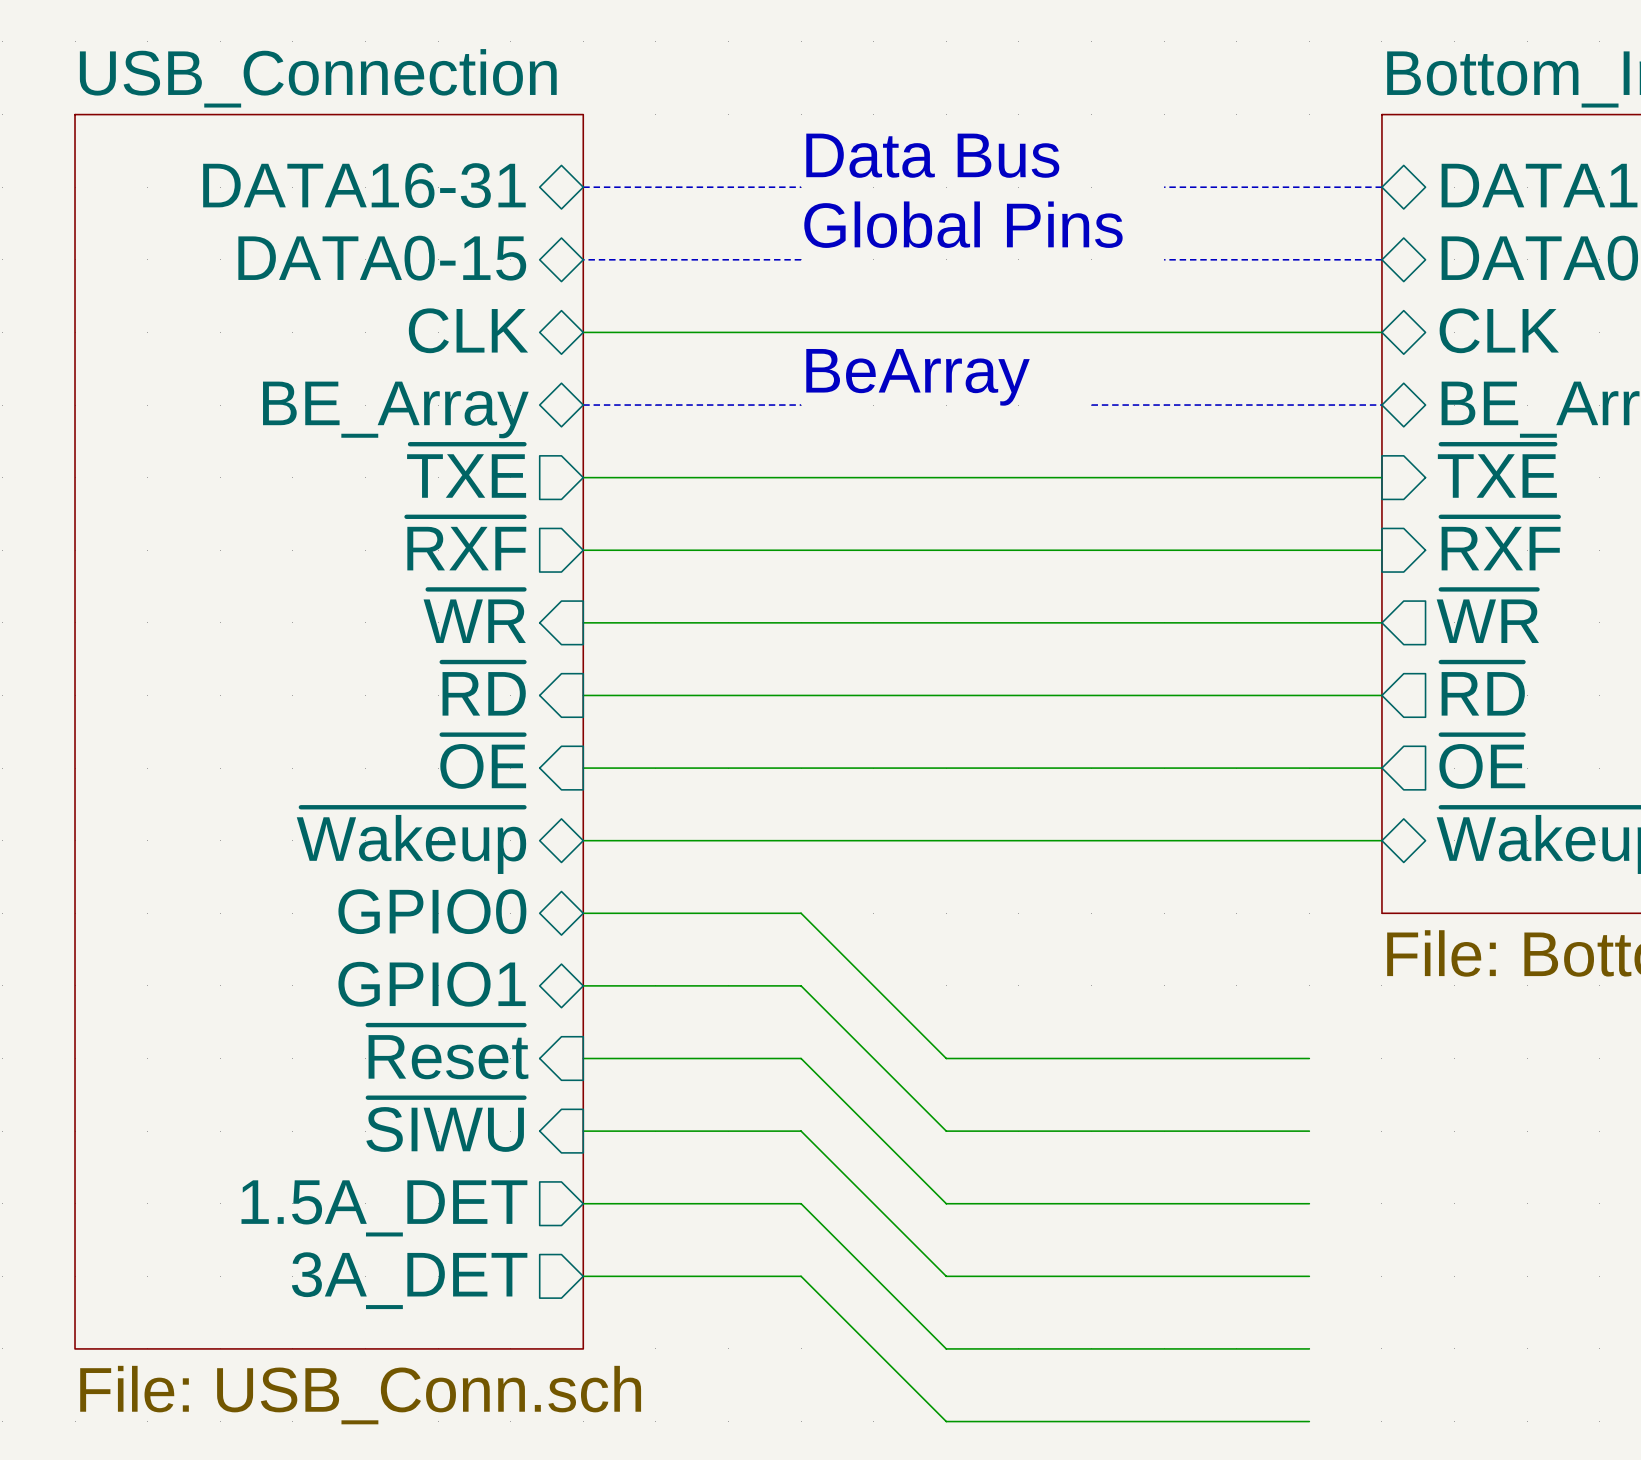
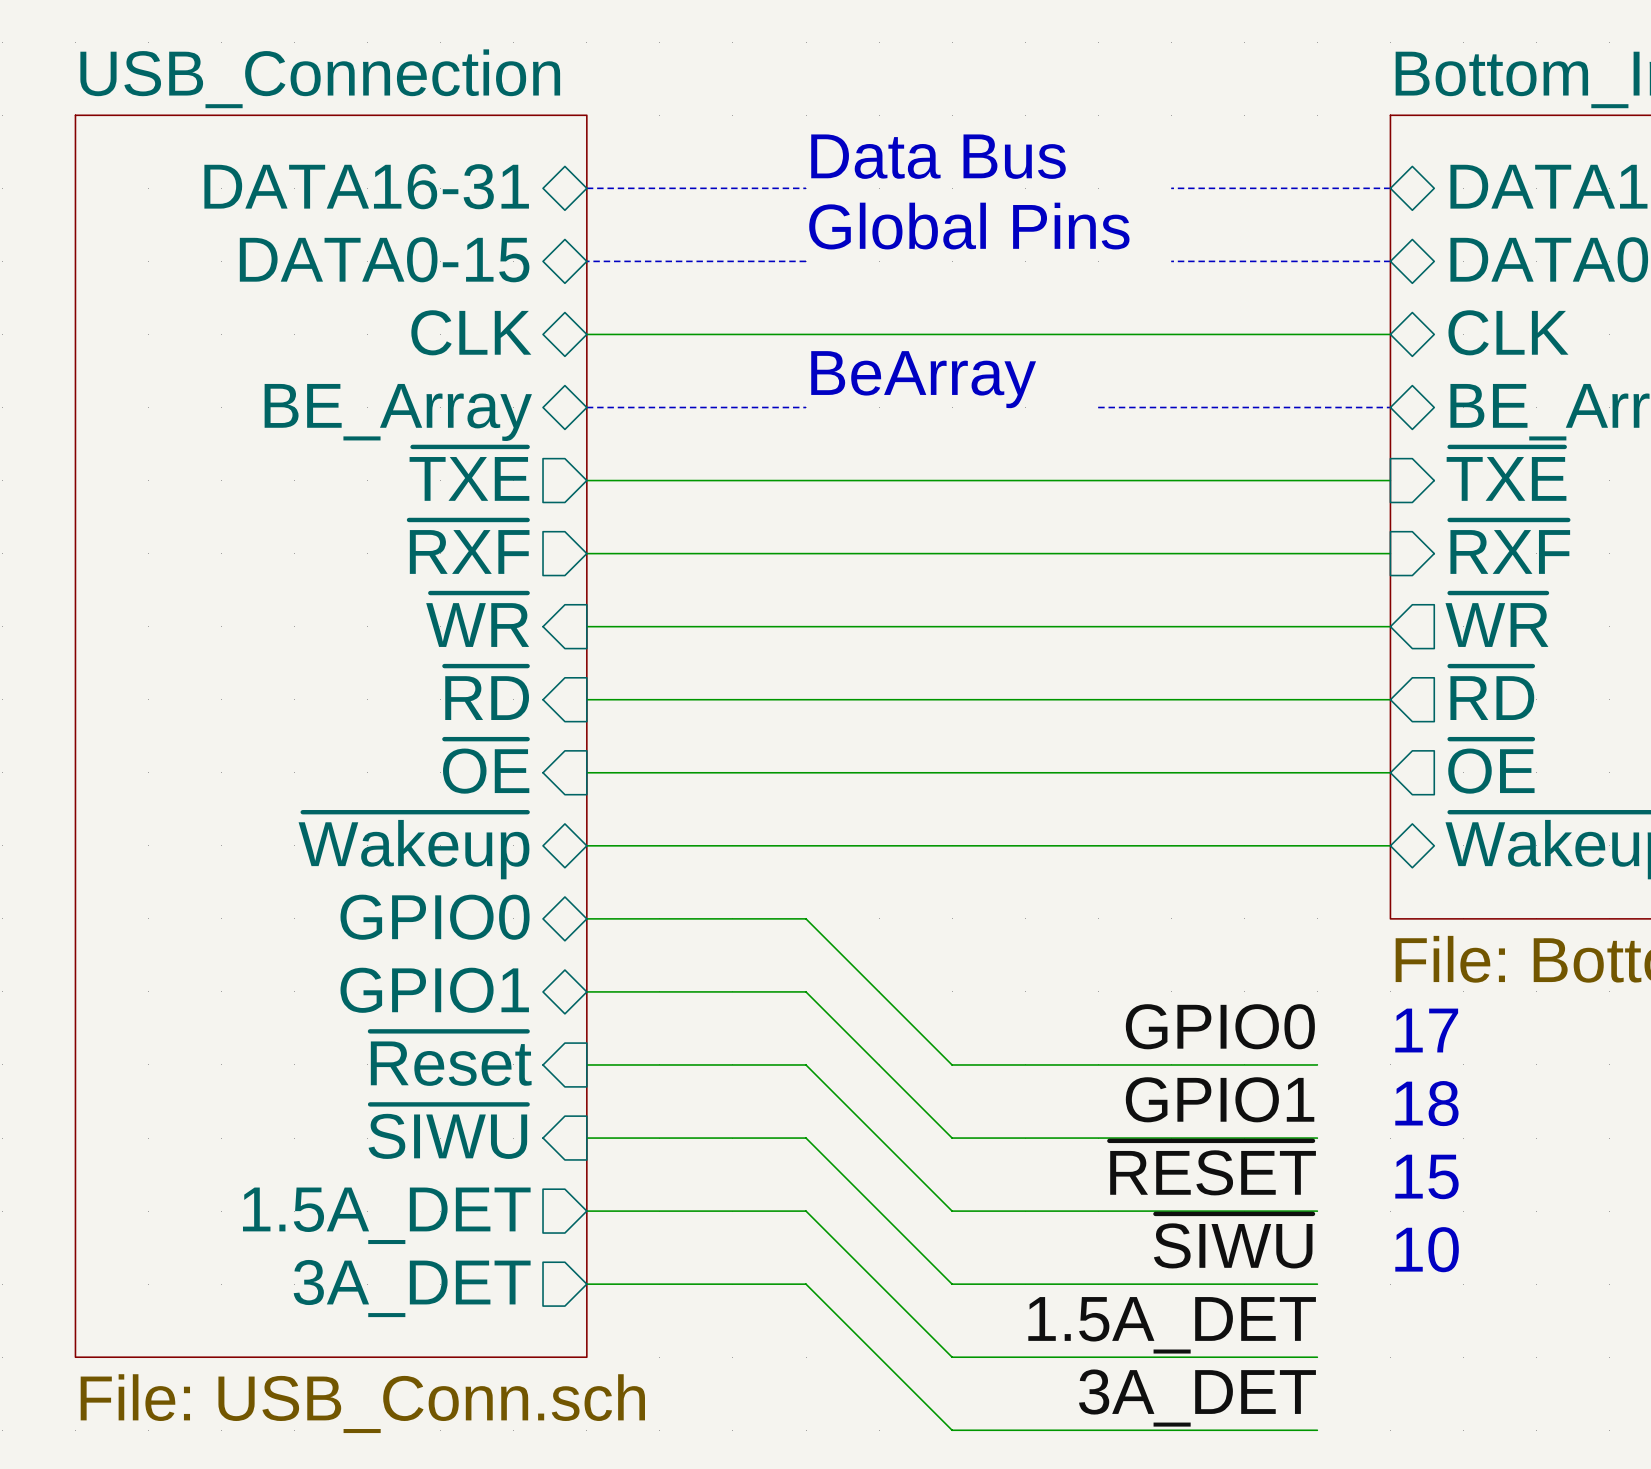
label: none -> GPIO0 (1220, 1026)
text: none -> 17 (1426, 1030)
label: none -> GPIO1 (1220, 1099)
text: none -> 18 (1426, 1103)
label: none -> ~{RESET} (1212, 1168)
text: none -> 15 (1426, 1176)
label: none -> ~{SIWU} (1233, 1241)
text: none -> 10 (1427, 1249)
label: none -> 1.5A_DET (1172, 1325)
label: none -> 3A_DET (1197, 1398)

